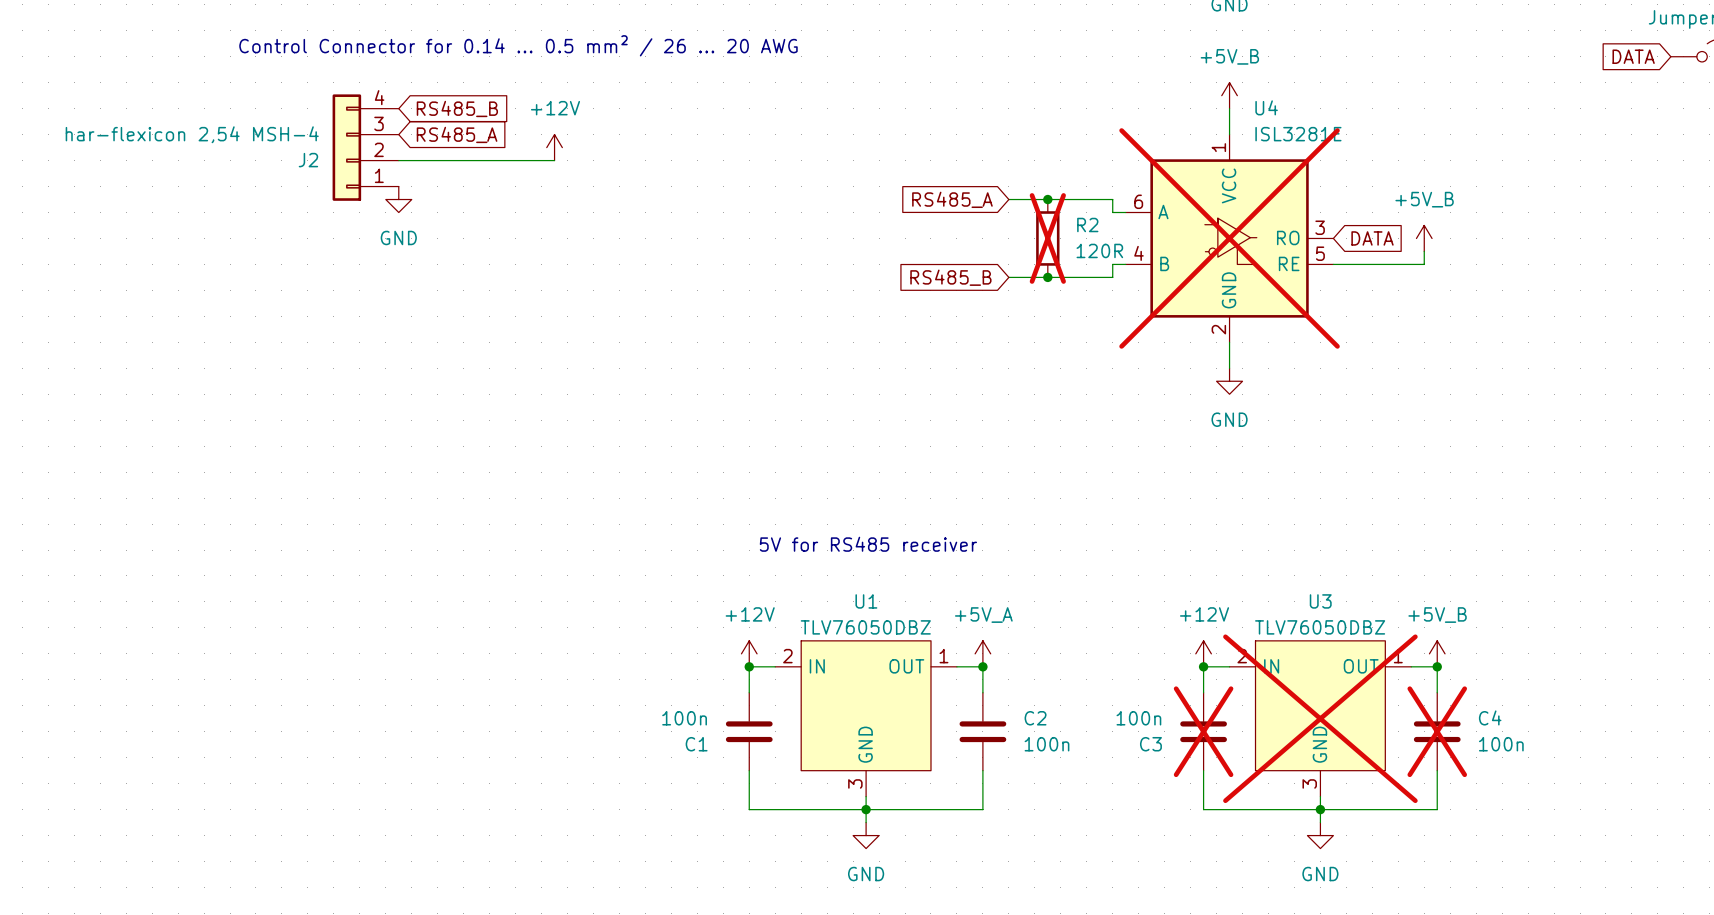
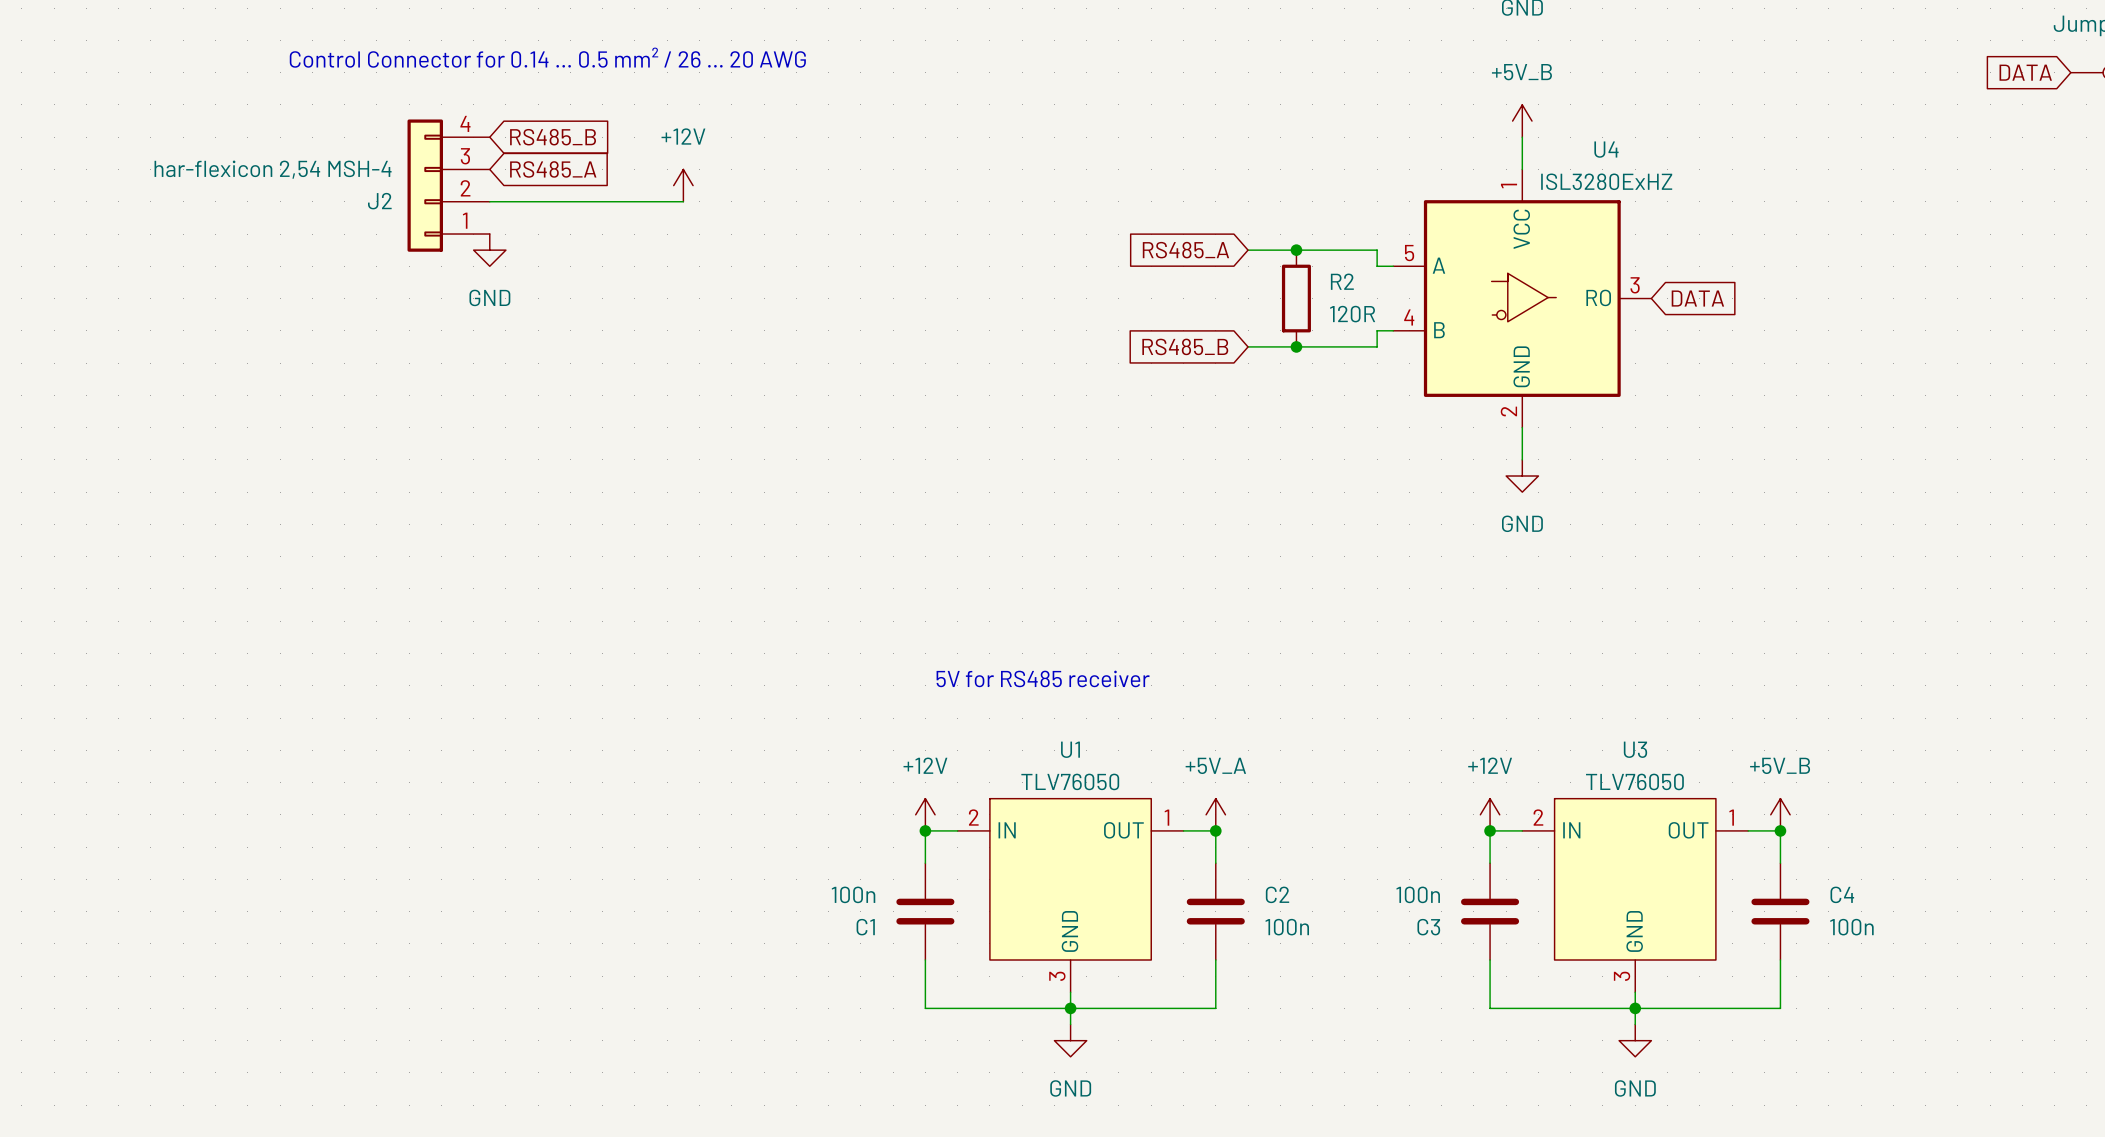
U4 name position: U4 (1266, 107) -> U4 (1606, 149)
U4 symbol: [1125, 134, 1334, 343] -> [1393, 169, 1652, 428]
U4 value: ISL3281E (1298, 134) -> ISL3280ExHZ (1606, 181)
R2 do-not-place cross: (1047, 238) -> none
U4 do-not-place cross: (1229, 238) -> none
power symbol: +5V_B (1424, 238) -> none
wire: (1424, 251) (1424, 264) (1333, 264) -> none
U1 value: TLV76050DBZ (865, 627) -> TLV76050 (1070, 781)
U3 value: TLV76050DBZ (1320, 627) -> TLV76050 (1634, 781)
U3 do-not-place cross: (1320, 718) -> none
C3 do-not-place cross: (1203, 731) -> none
C4 do-not-place cross: (1437, 731) -> none

